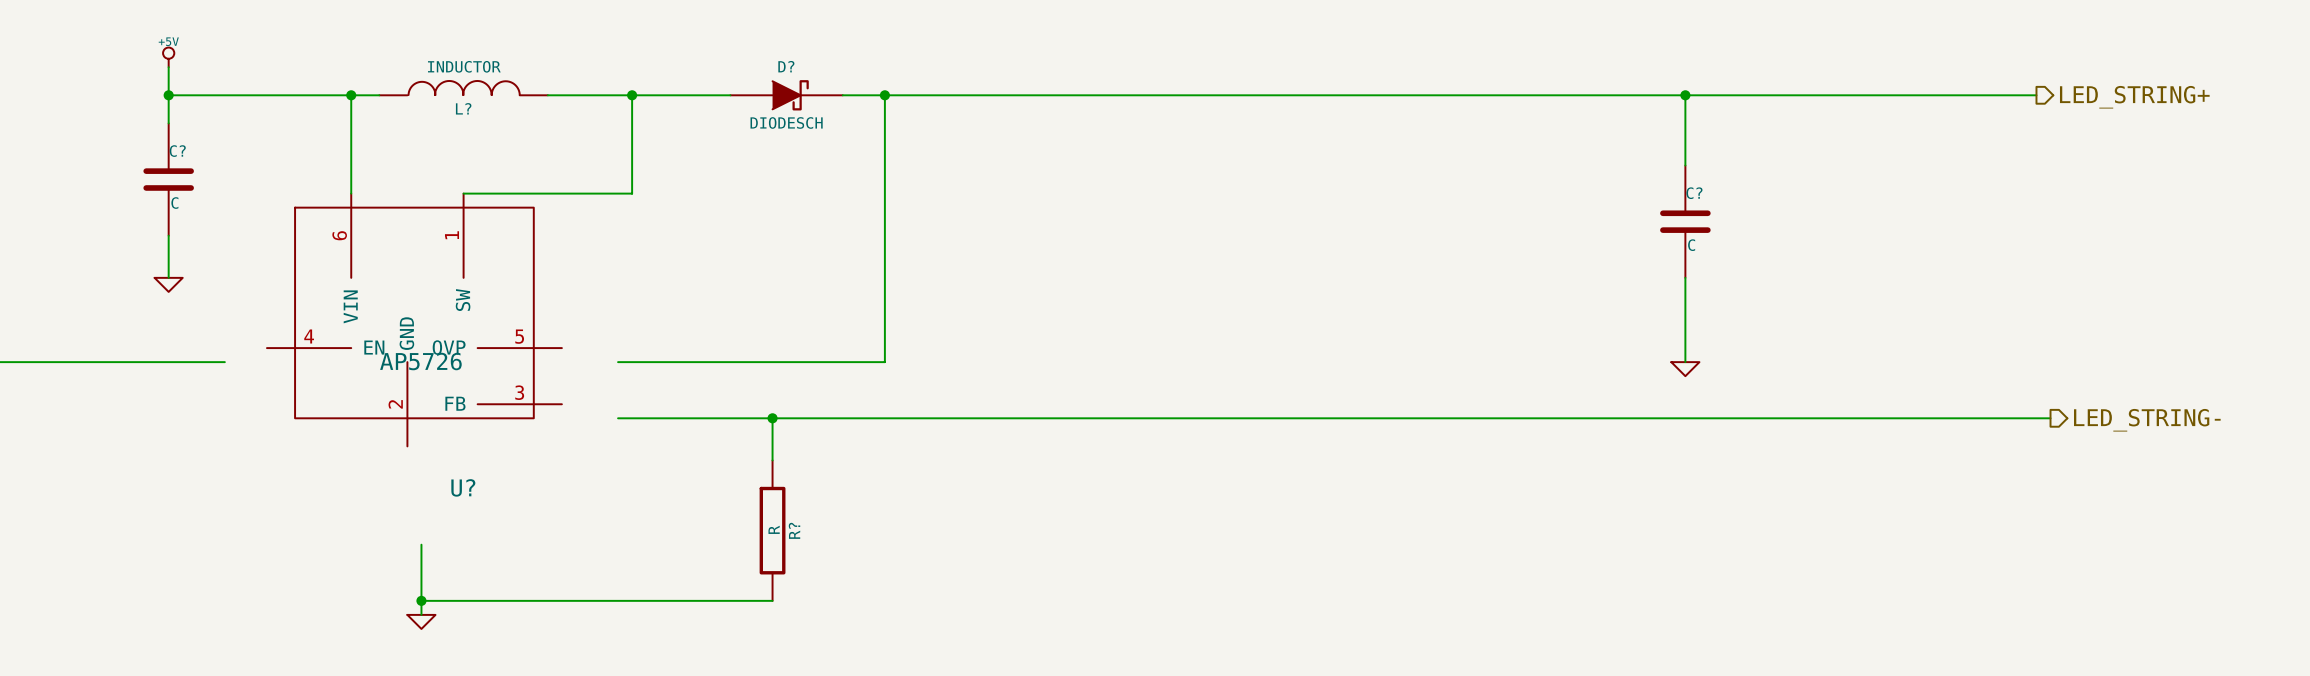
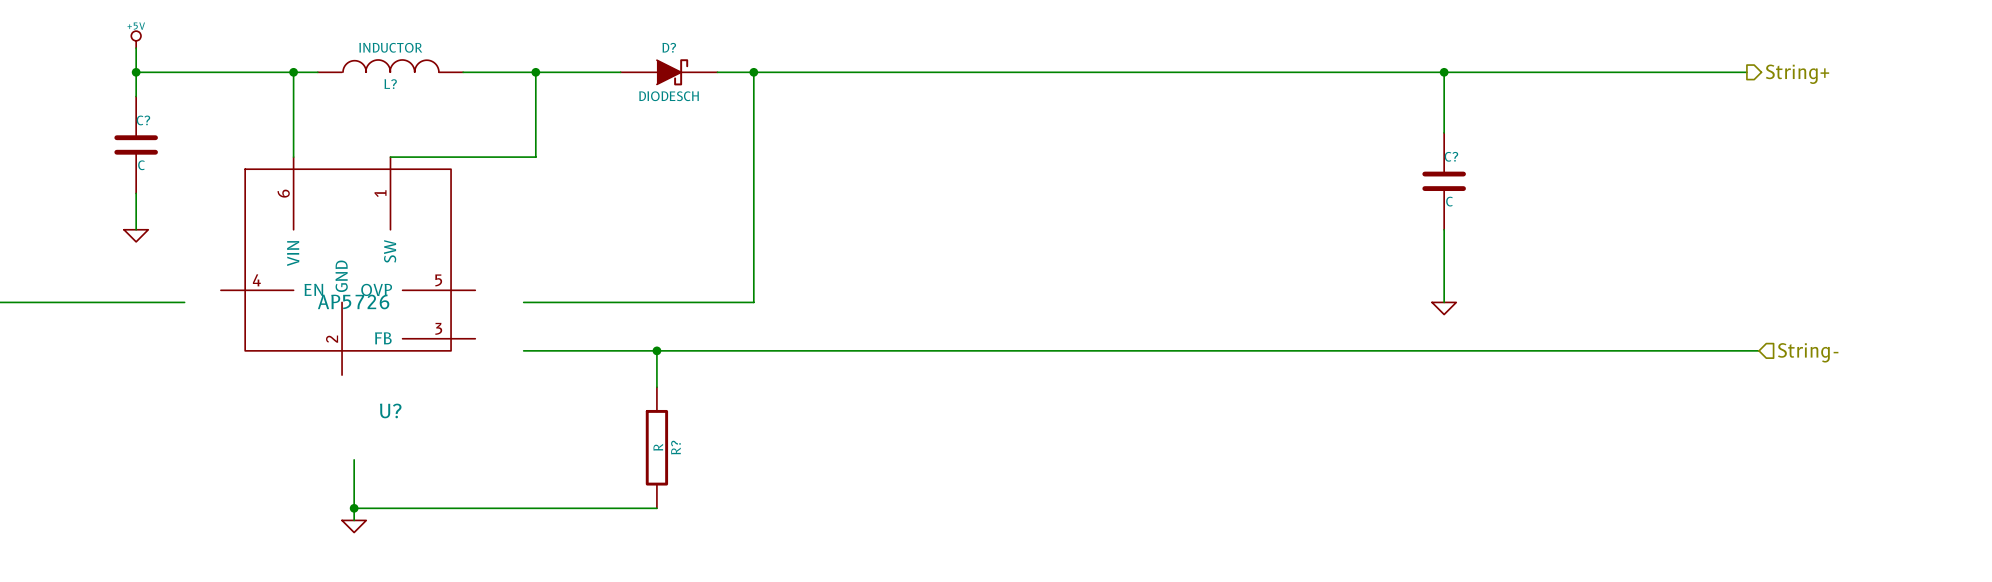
hierarchical label: LED_STRING+ (2134, 97) -> String+ (1797, 74)
hierarchical label shape: output (2147, 420) -> input (1808, 352)
hierarchical label: LED_STRING- (2147, 420) -> String- (1808, 352)

